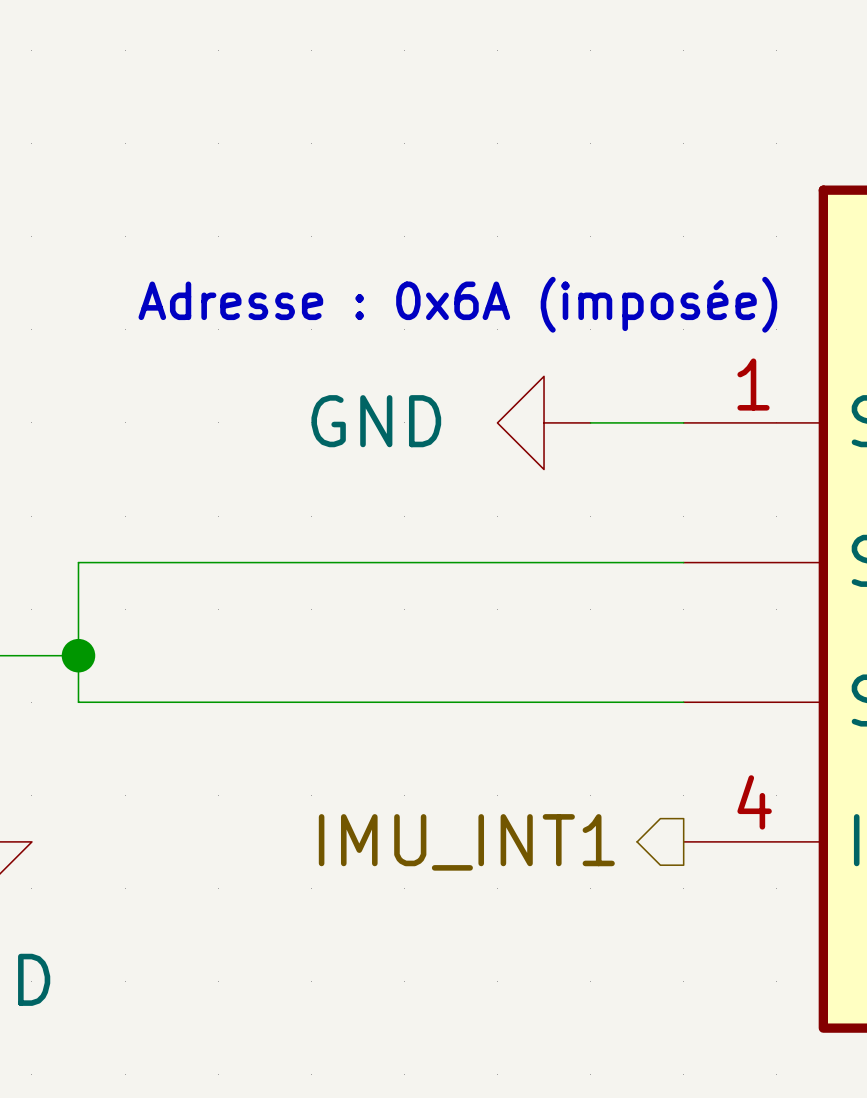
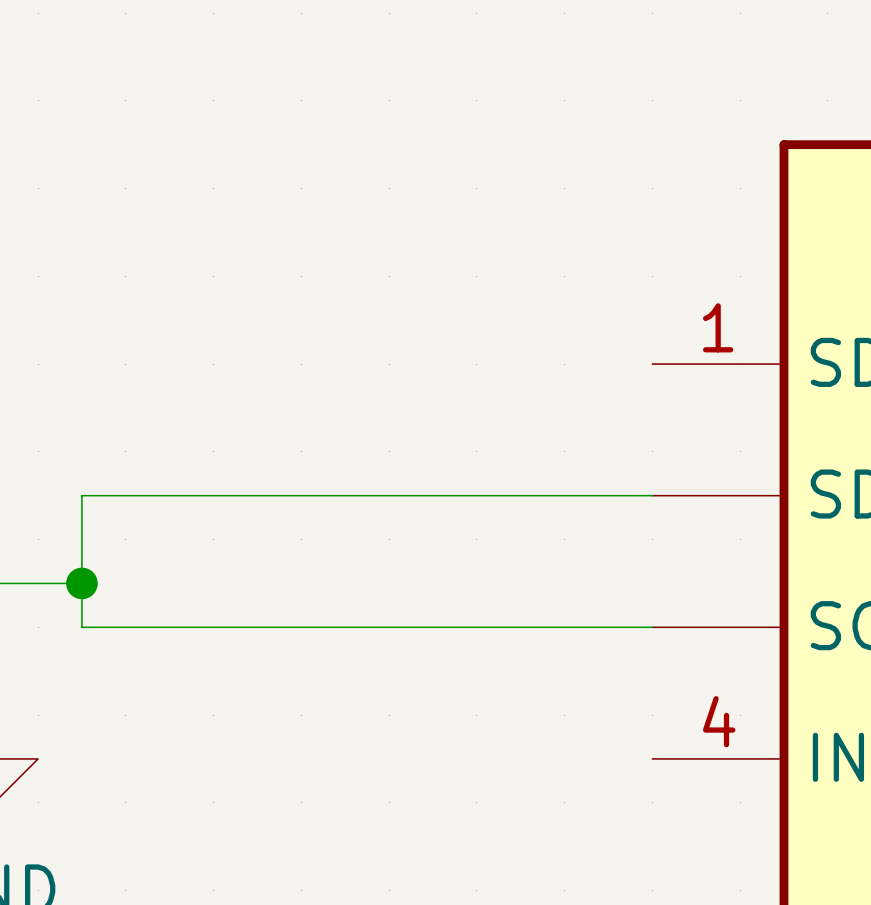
text: Adresse : 0x6A (imposée) (457, 304) -> none
power symbol: GND (544, 422) -> none
wire: (590, 422) (683, 422) -> none
hierarchical label: IMU_INT1 (466, 842) -> none

